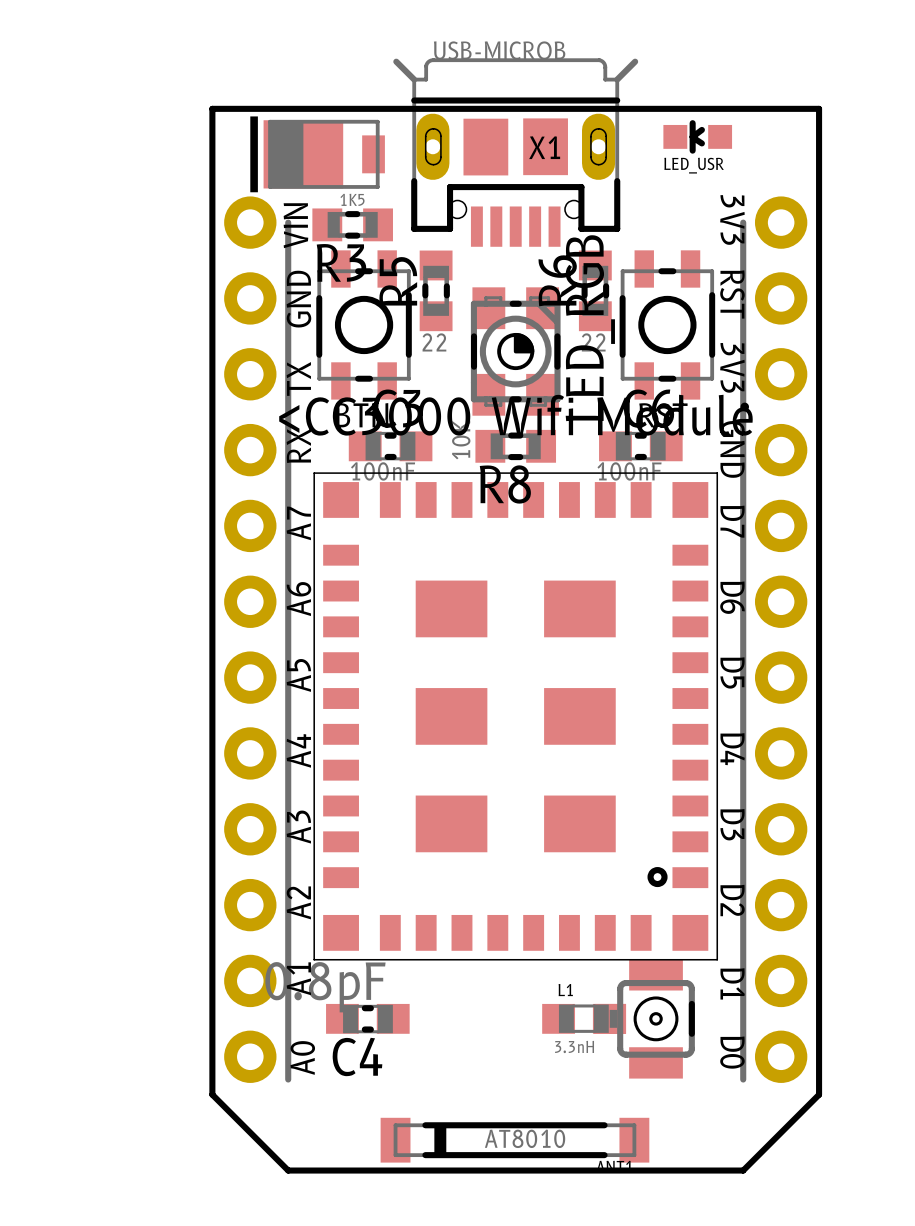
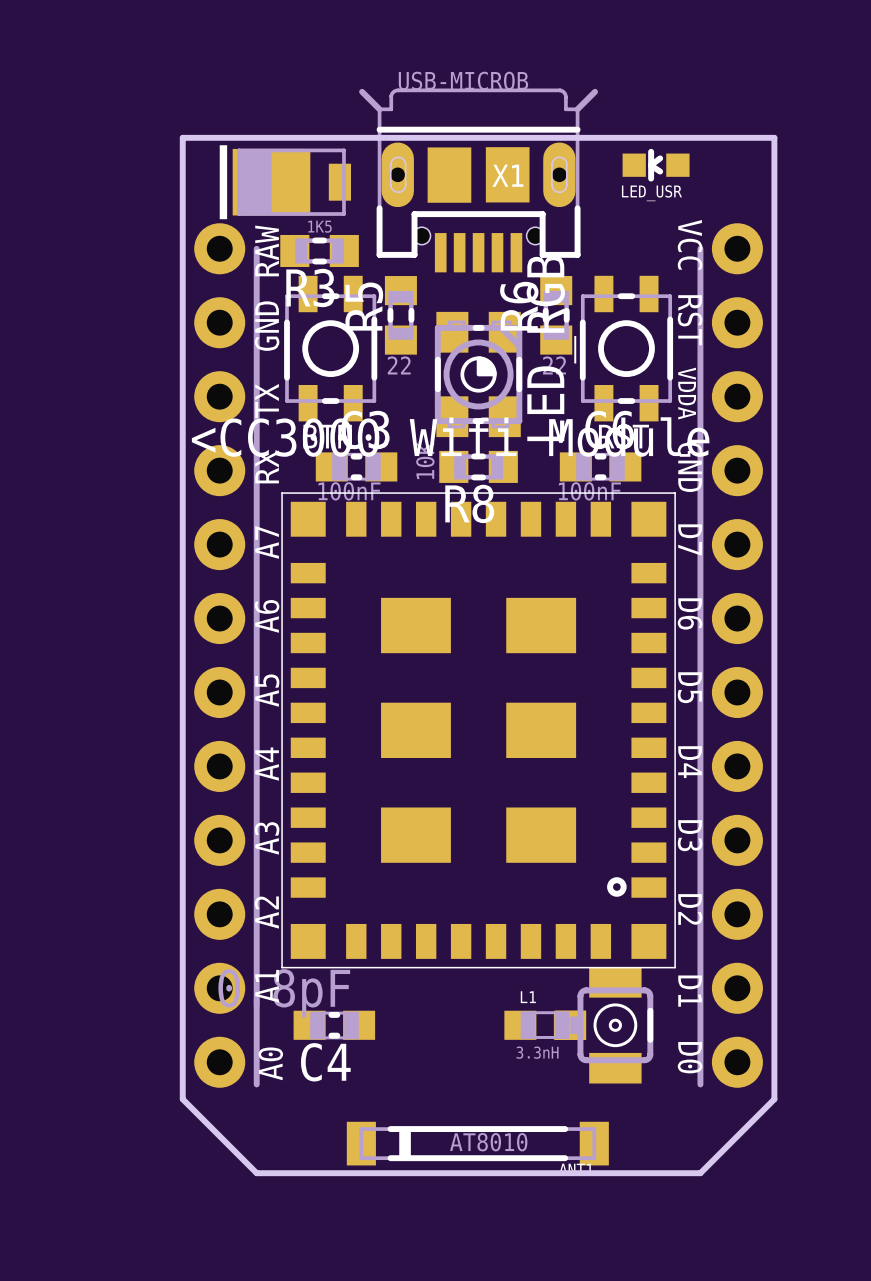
text: 3V3 (732, 219) -> VCC (690, 244)
text: VIN (295, 225) -> RAW (267, 250)
text: 3V3 (732, 367) -> VDDA (687, 393)
drawing: [740, 402, 749, 412] -> none

